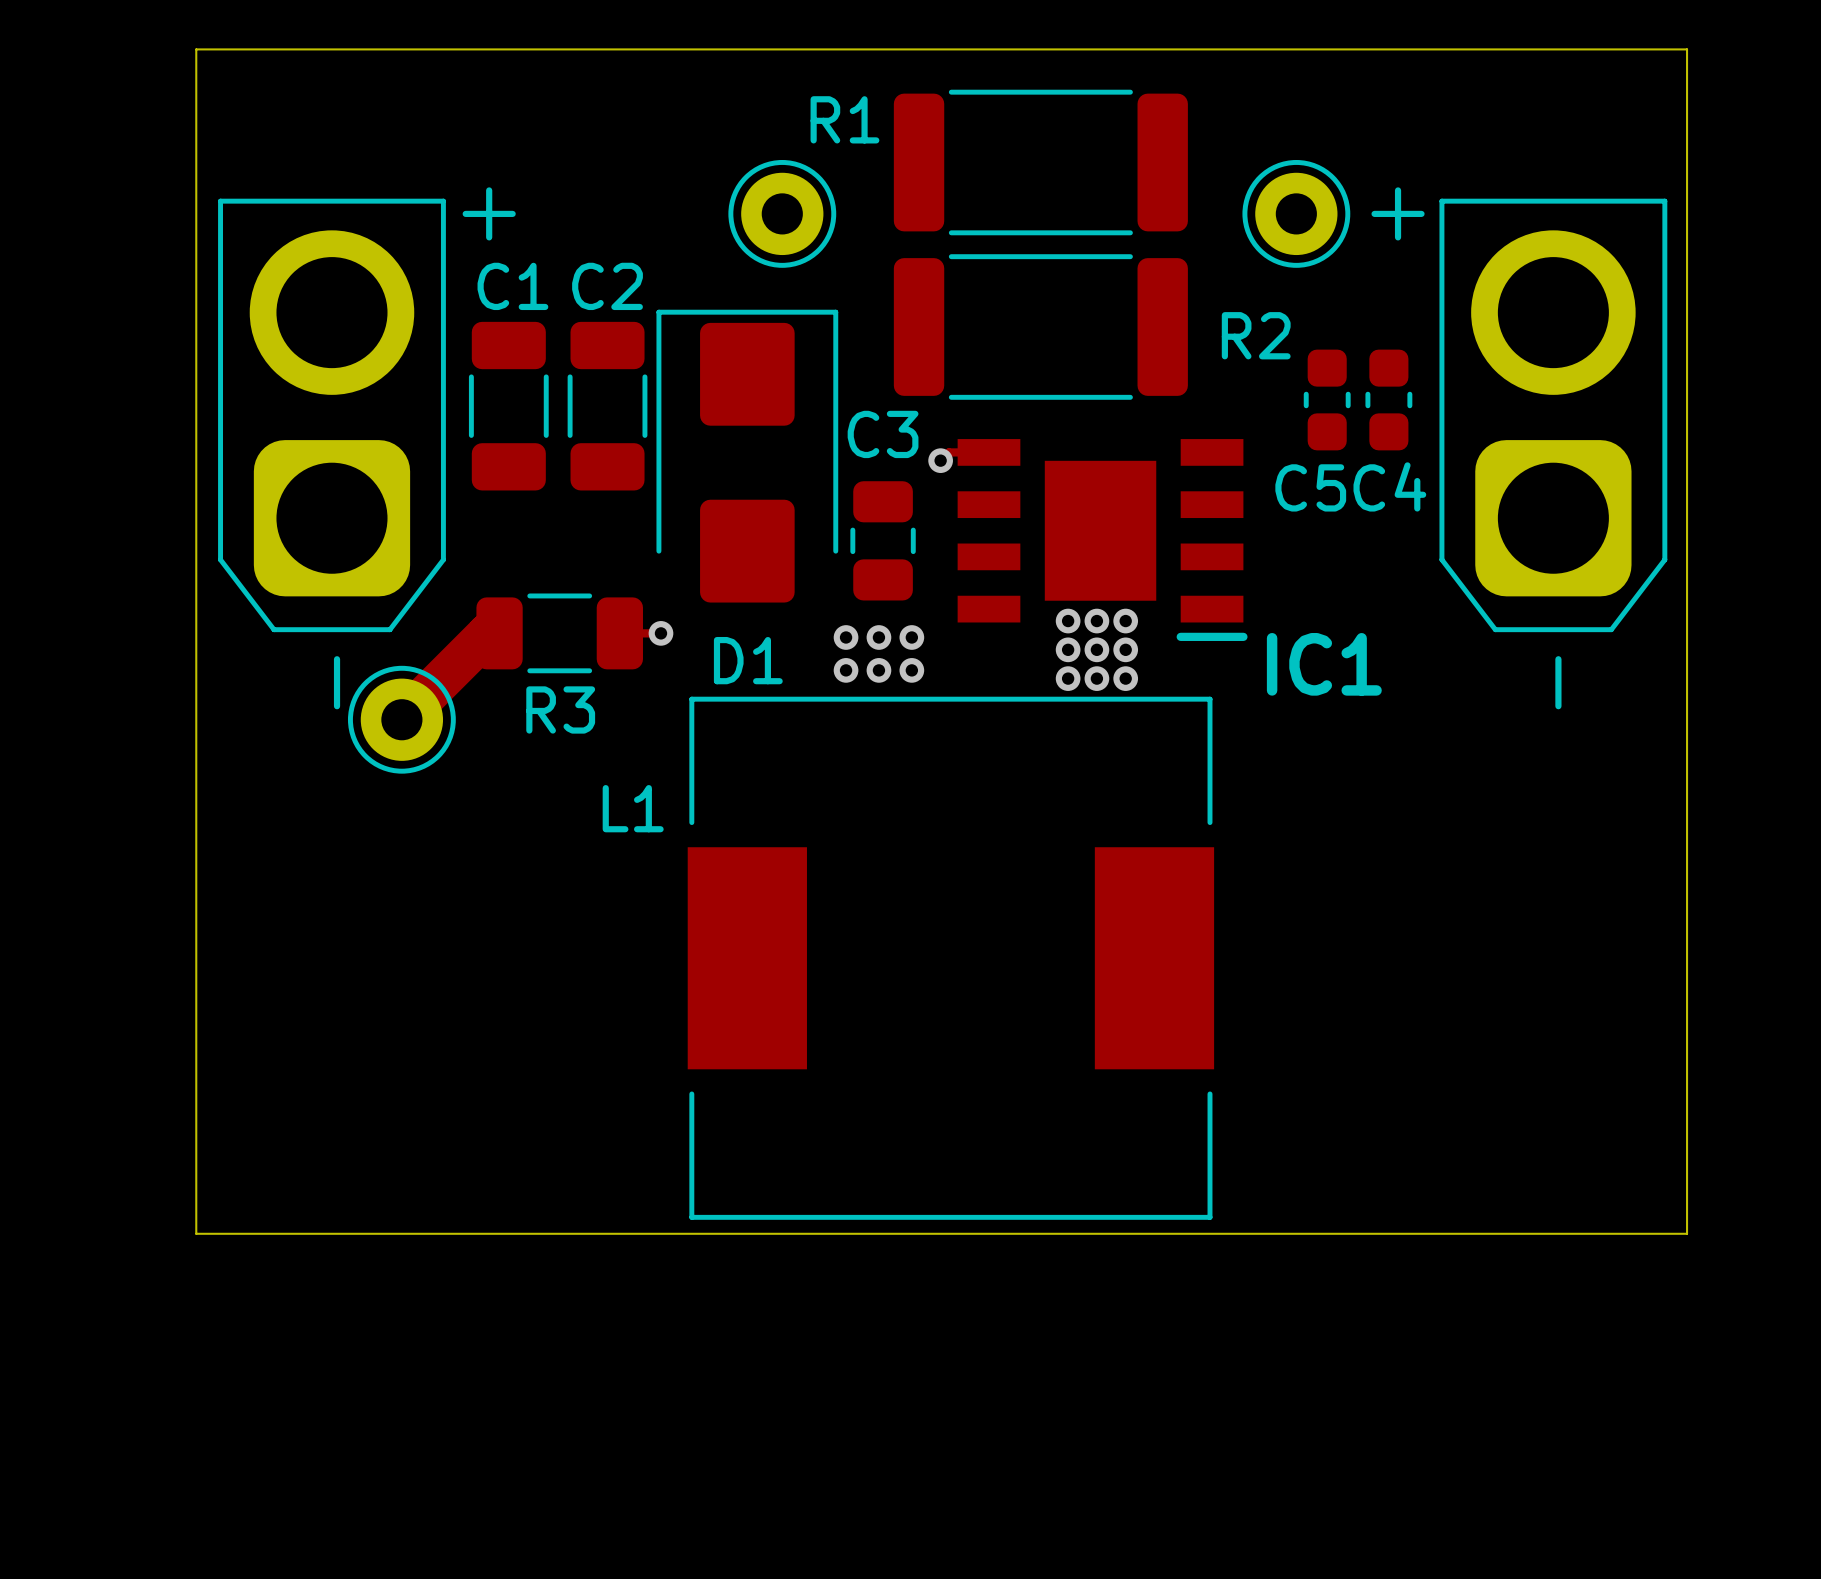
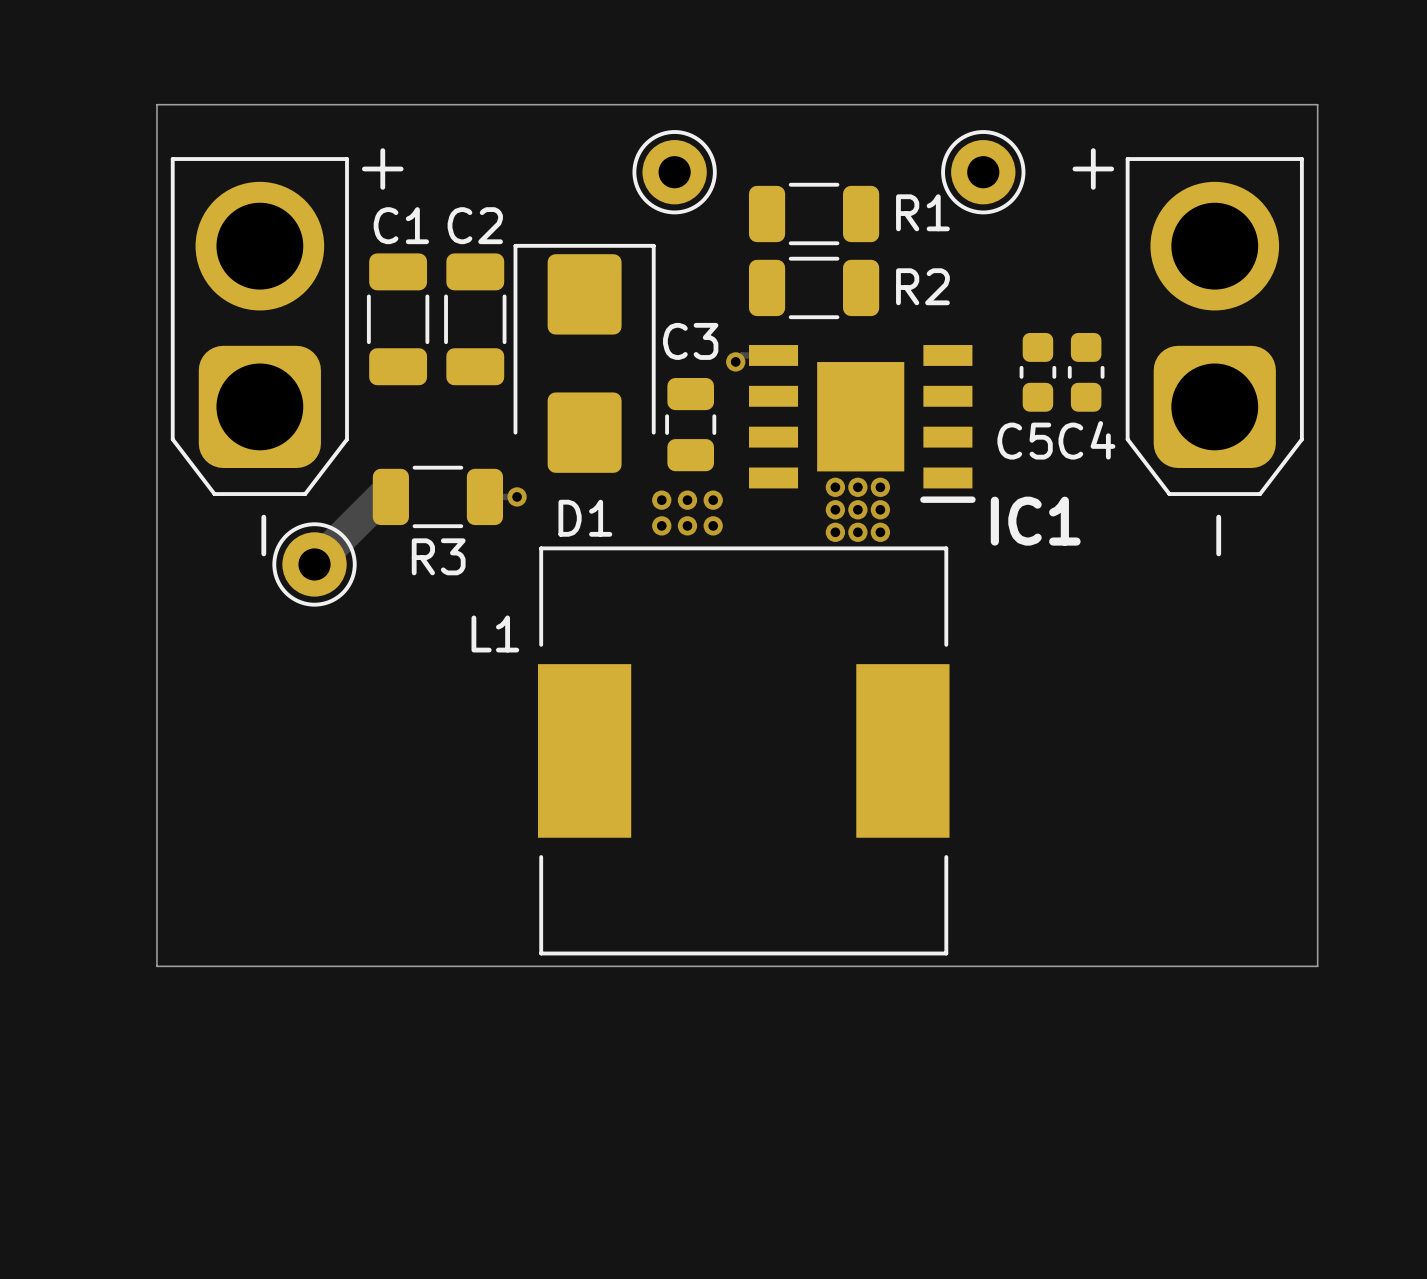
R1 footprint: [893, 89, 1188, 236] -> [748, 182, 880, 246]
R1 name position: R1 (844, 119) -> R1 (922, 212)
part position: (782, 213) -> (674, 172)
part position: (1296, 213) -> (983, 172)
R2 footprint: [893, 254, 1188, 400] -> [748, 256, 880, 320]
C5 position: (1327, 399) -> (1037, 372)
C4 position: (1388, 399) -> (1086, 372)
board edge: (200, 1233) (196, 1233) (196, 49) (1687, 49) (1687, 1233) (1684, 1233) -> (156, 966) (156, 104) (1317, 104) (1317, 966)

